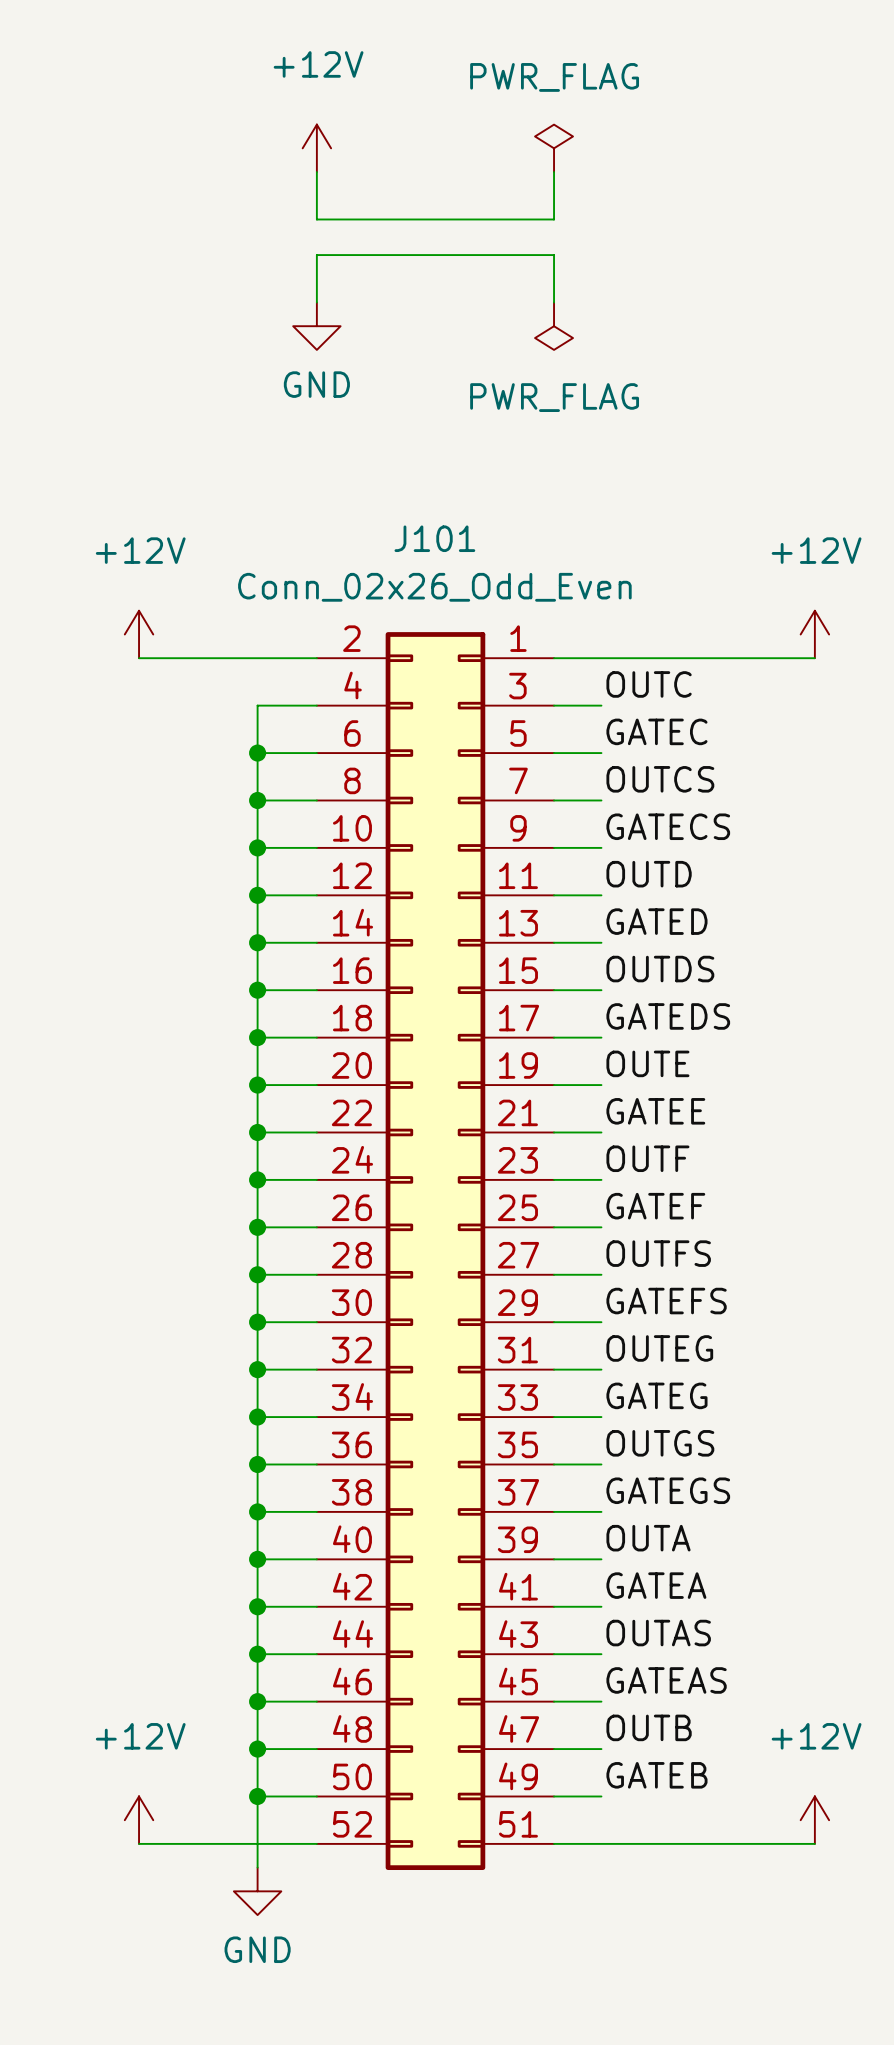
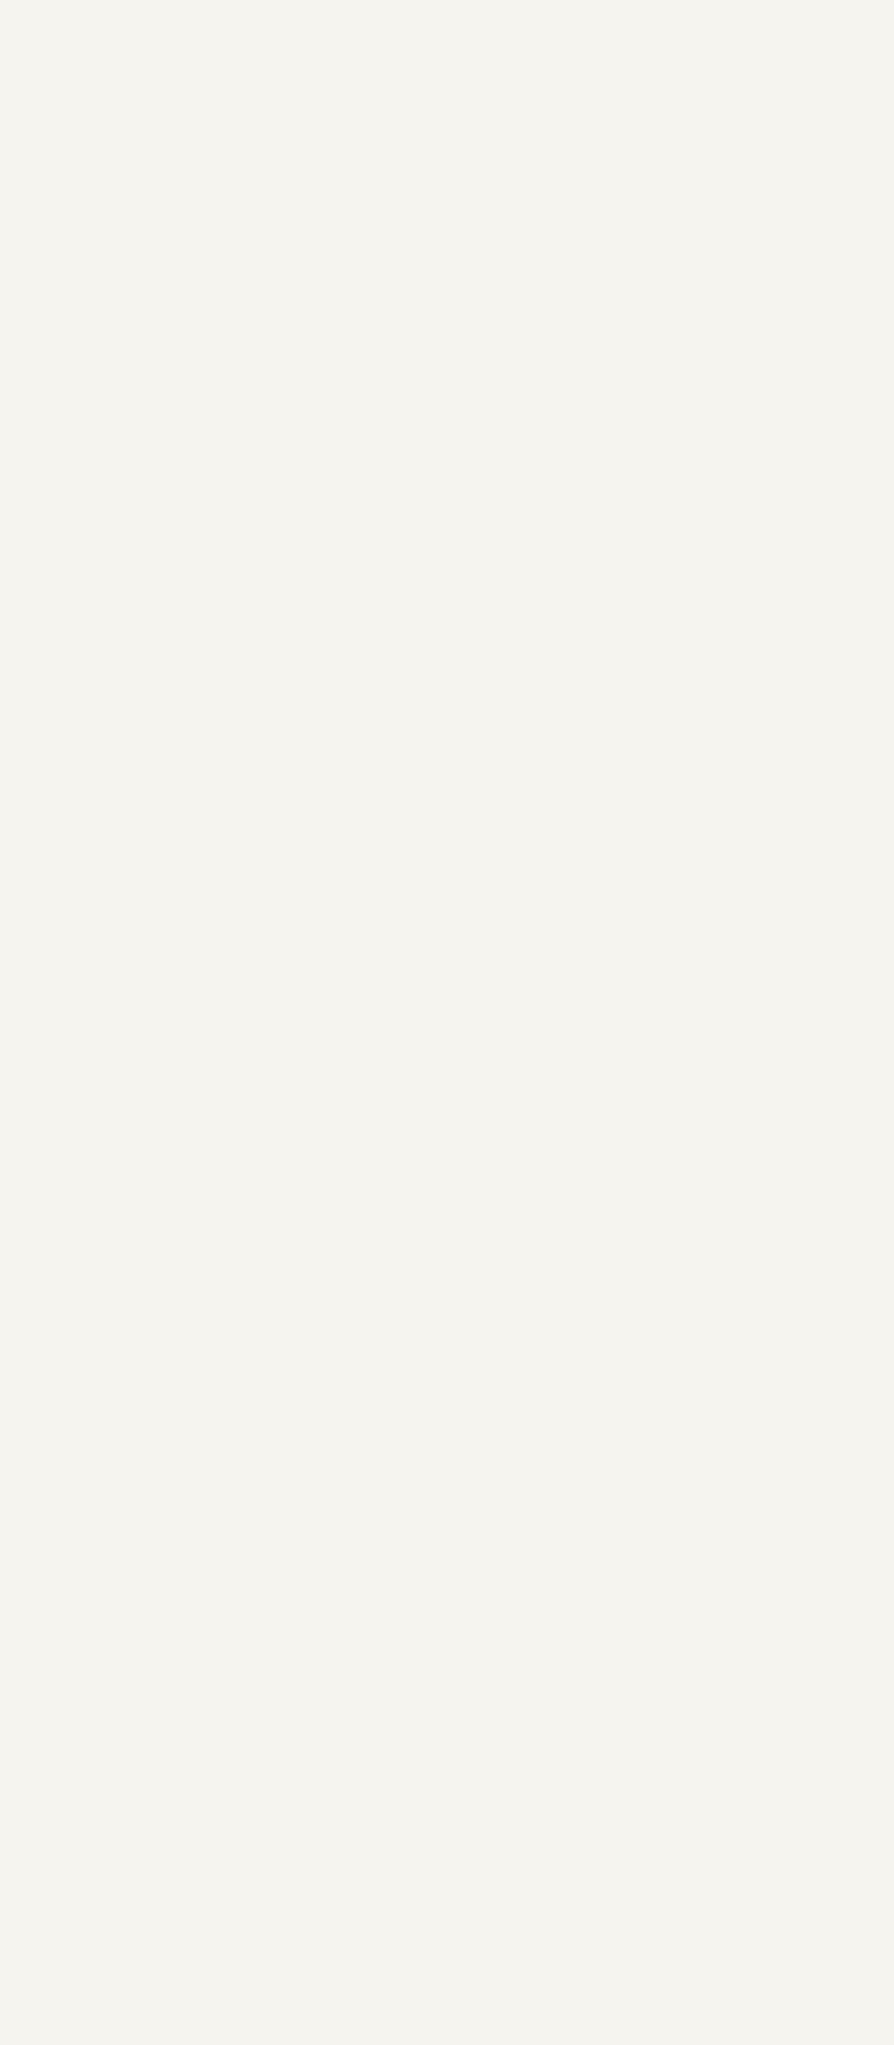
power symbol: +12V (316, 148) -> none
power symbol: PWR_FLAG (554, 148) -> none
wire: (316, 172) (316, 219) (554, 219) (554, 172) -> none
wire: (316, 302) (316, 255) (554, 255) (554, 302) -> none
power symbol: GND (316, 326) -> none
power symbol: PWR_FLAG (554, 326) -> none
power symbol: +12V (139, 634) -> none
power symbol: +12V (814, 634) -> none
wire: (139, 658) (316, 658) -> none
wire: (554, 658) (814, 658) -> none
label: OUTC (649, 684) -> none
wire: (316, 705) (257, 705) (257, 1867) -> none
wire: (554, 705) (601, 705) -> none
label: GATEC (656, 731) -> none
wire: (257, 753) (316, 753) -> none
junction: (257, 753) -> none
wire: (554, 753) (601, 753) -> none
label: OUTCS (660, 779) -> none
wire: (257, 800) (316, 800) -> none
junction: (257, 800) -> none
wire: (554, 800) (601, 800) -> none
label: GATECS (668, 826) -> none
wire: (257, 847) (316, 847) -> none
junction: (257, 847) -> none
wire: (554, 847) (601, 847) -> none
label: OUTD (649, 874) -> none
wire: (257, 895) (316, 895) -> none
junction: (257, 895) -> none
wire: (554, 895) (601, 895) -> none
label: GATED (656, 921) -> none
wire: (257, 942) (316, 942) -> none
junction: (257, 942) -> none
wire: (554, 942) (601, 942) -> none
label: OUTDS (660, 969) -> none
wire: (257, 990) (316, 990) -> none
junction: (257, 990) -> none
wire: (554, 990) (601, 990) -> none
label: GATEDS (668, 1016) -> none
wire: (257, 1037) (316, 1037) -> none
junction: (257, 1037) -> none
wire: (554, 1037) (601, 1037) -> none
label: OUTE (647, 1063) -> none
wire: (257, 1085) (316, 1085) -> none
junction: (257, 1085) -> none
wire: (554, 1085) (601, 1085) -> none
label: GATEE (655, 1111) -> none
wire: (257, 1132) (316, 1132) -> none
junction: (257, 1132) -> none
wire: (554, 1132) (601, 1132) -> none
label: OUTF (647, 1158) -> none
wire: (257, 1179) (316, 1179) -> none
junction: (257, 1179) -> none
wire: (554, 1179) (601, 1179) -> none
label: GATEF (655, 1206) -> none
wire: (257, 1227) (316, 1227) -> none
junction: (257, 1227) -> none
wire: (554, 1227) (601, 1227) -> none
J101: Conn_02x26_Odd_Even (435, 1251) -> none
label: OUTFS (658, 1253) -> none
wire: (257, 1274) (316, 1274) -> none
junction: (257, 1274) -> none
wire: (554, 1274) (601, 1274) -> none
label: GATEFS (666, 1301) -> none
wire: (257, 1322) (316, 1322) -> none
junction: (257, 1322) -> none
wire: (554, 1322) (601, 1322) -> none
label: OUTEG (659, 1348) -> none
wire: (257, 1369) (316, 1369) -> none
junction: (257, 1369) -> none
wire: (554, 1369) (601, 1369) -> none
label: GATEG (656, 1395) -> none
wire: (257, 1417) (316, 1417) -> none
junction: (257, 1417) -> none
wire: (554, 1417) (601, 1417) -> none
label: OUTGS (660, 1443) -> none
wire: (257, 1464) (316, 1464) -> none
junction: (257, 1464) -> none
wire: (554, 1464) (601, 1464) -> none
label: GATEGS (668, 1490) -> none
wire: (257, 1511) (316, 1511) -> none
junction: (257, 1511) -> none
wire: (554, 1511) (601, 1511) -> none
label: OUTA (648, 1538) -> none
wire: (257, 1559) (316, 1559) -> none
junction: (257, 1559) -> none
wire: (554, 1559) (601, 1559) -> none
label: GATEA (656, 1585) -> none
wire: (257, 1606) (316, 1606) -> none
junction: (257, 1606) -> none
wire: (554, 1606) (601, 1606) -> none
label: OUTAS (658, 1633) -> none
wire: (257, 1654) (316, 1654) -> none
junction: (257, 1654) -> none
wire: (554, 1654) (601, 1654) -> none
label: GATEAS (666, 1680) -> none
wire: (257, 1701) (316, 1701) -> none
junction: (257, 1701) -> none
wire: (554, 1701) (601, 1701) -> none
label: OUTB (649, 1727) -> none
wire: (257, 1749) (316, 1749) -> none
junction: (257, 1749) -> none
wire: (554, 1749) (601, 1749) -> none
label: GATEB (656, 1775) -> none
wire: (257, 1796) (316, 1796) -> none
junction: (257, 1796) -> none
wire: (554, 1796) (601, 1796) -> none
power symbol: +12V (139, 1820) -> none
power symbol: +12V (814, 1820) -> none
wire: (139, 1843) (316, 1843) -> none
wire: (554, 1843) (814, 1843) -> none
power symbol: GND (257, 1891) -> none

